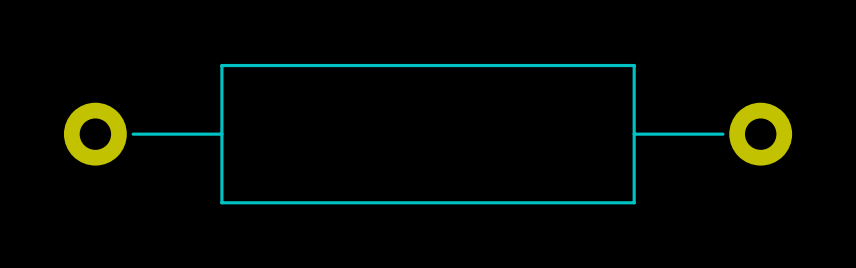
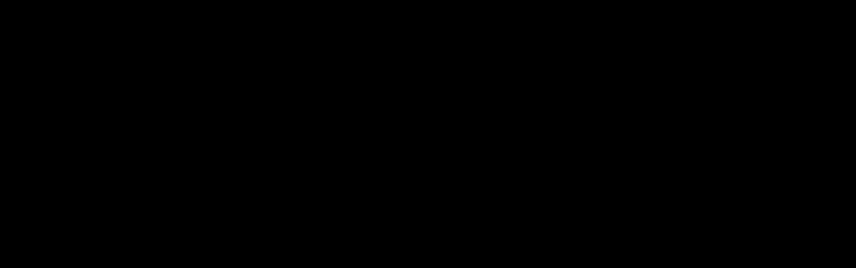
part: (428, 134) -> none

